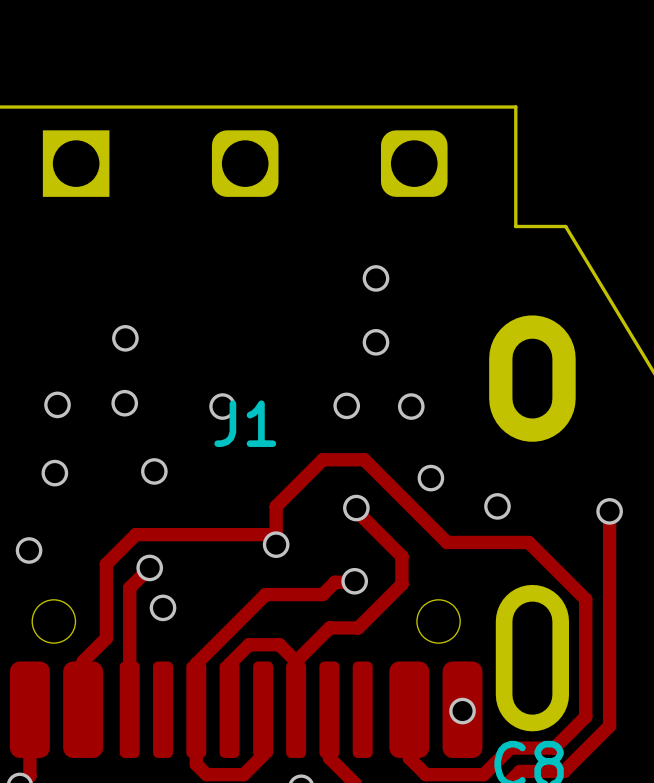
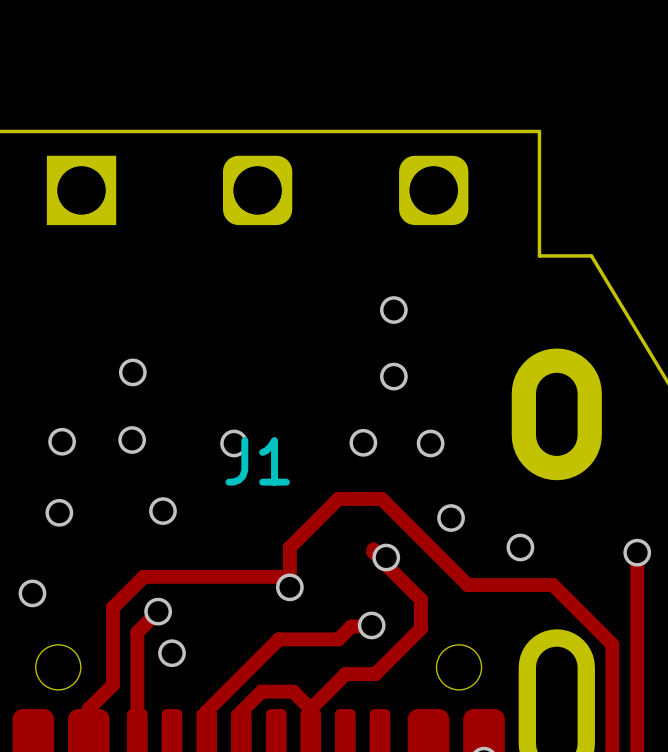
via position: (356, 508) -> (386, 557)

